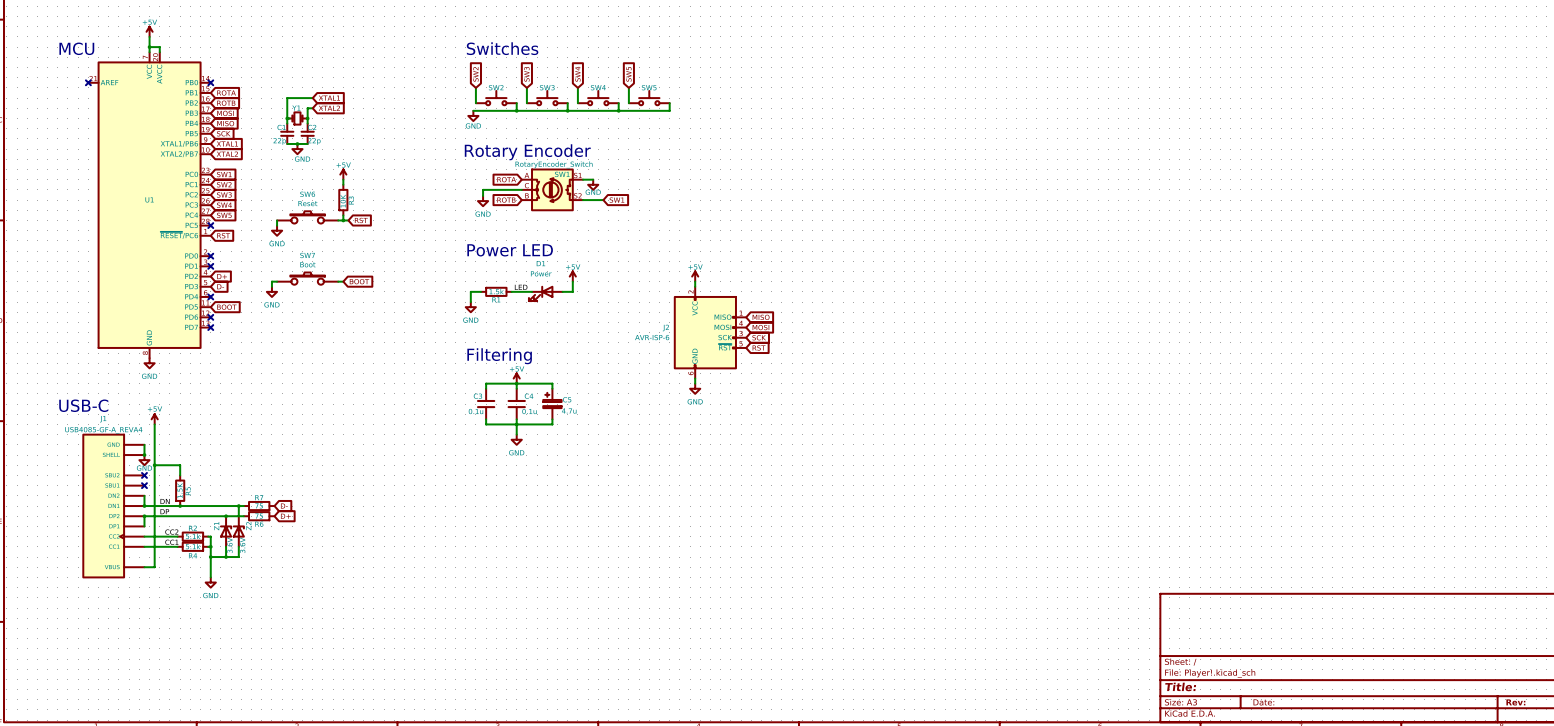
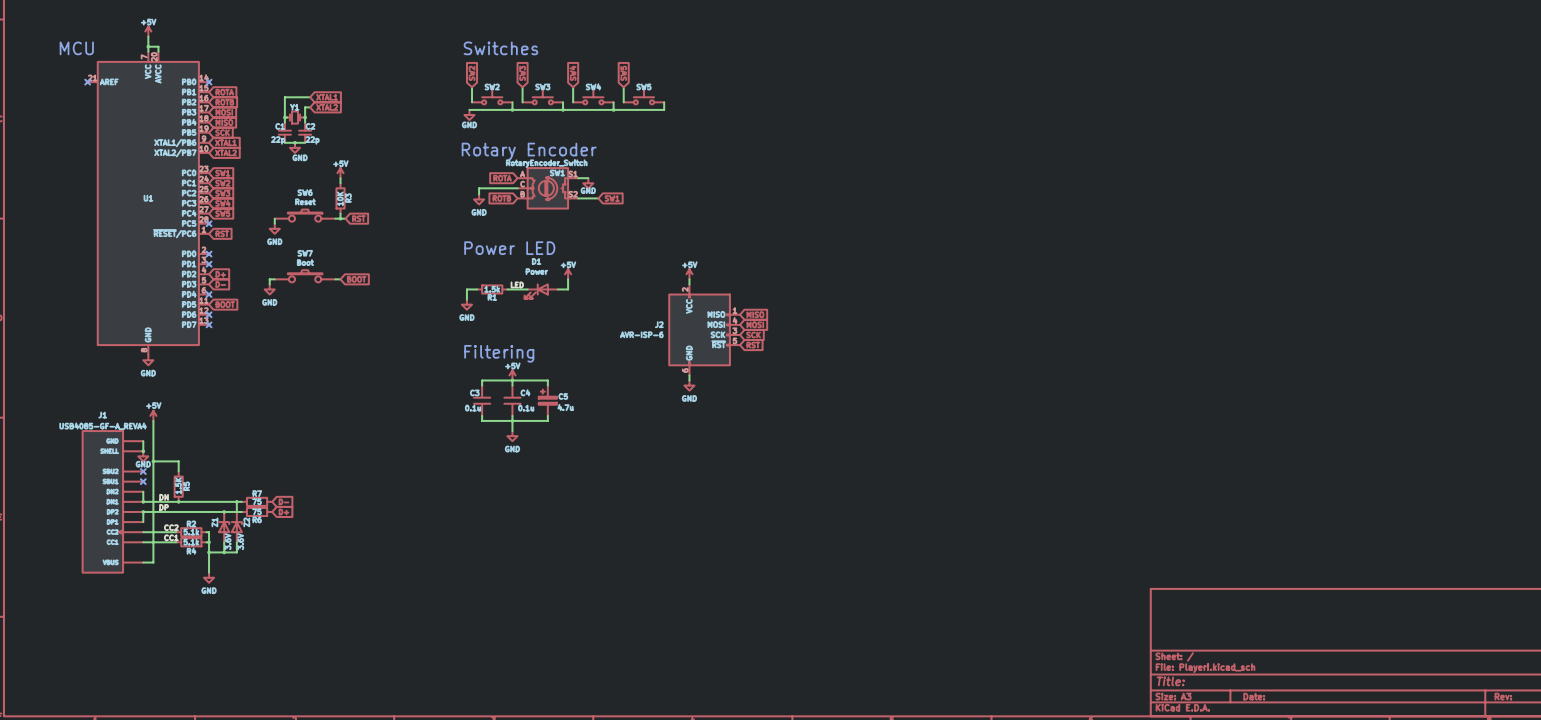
text: USB-C (83, 405) -> none

